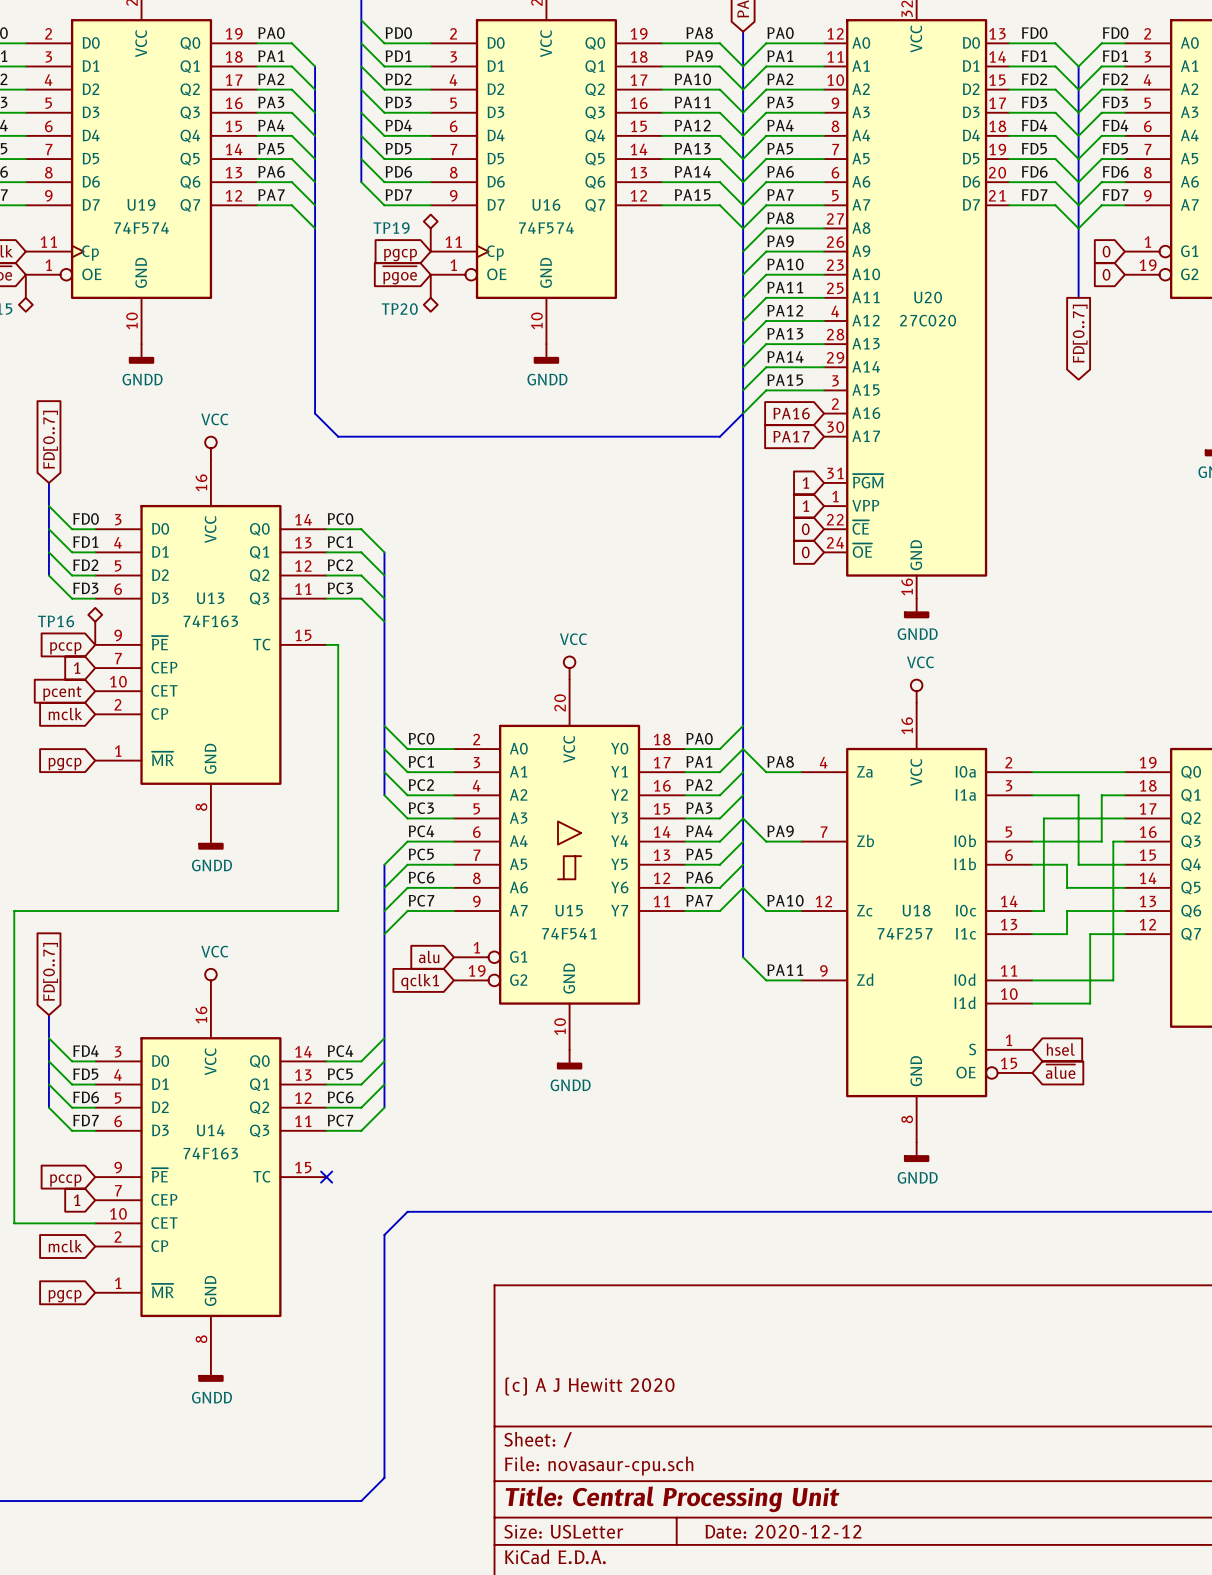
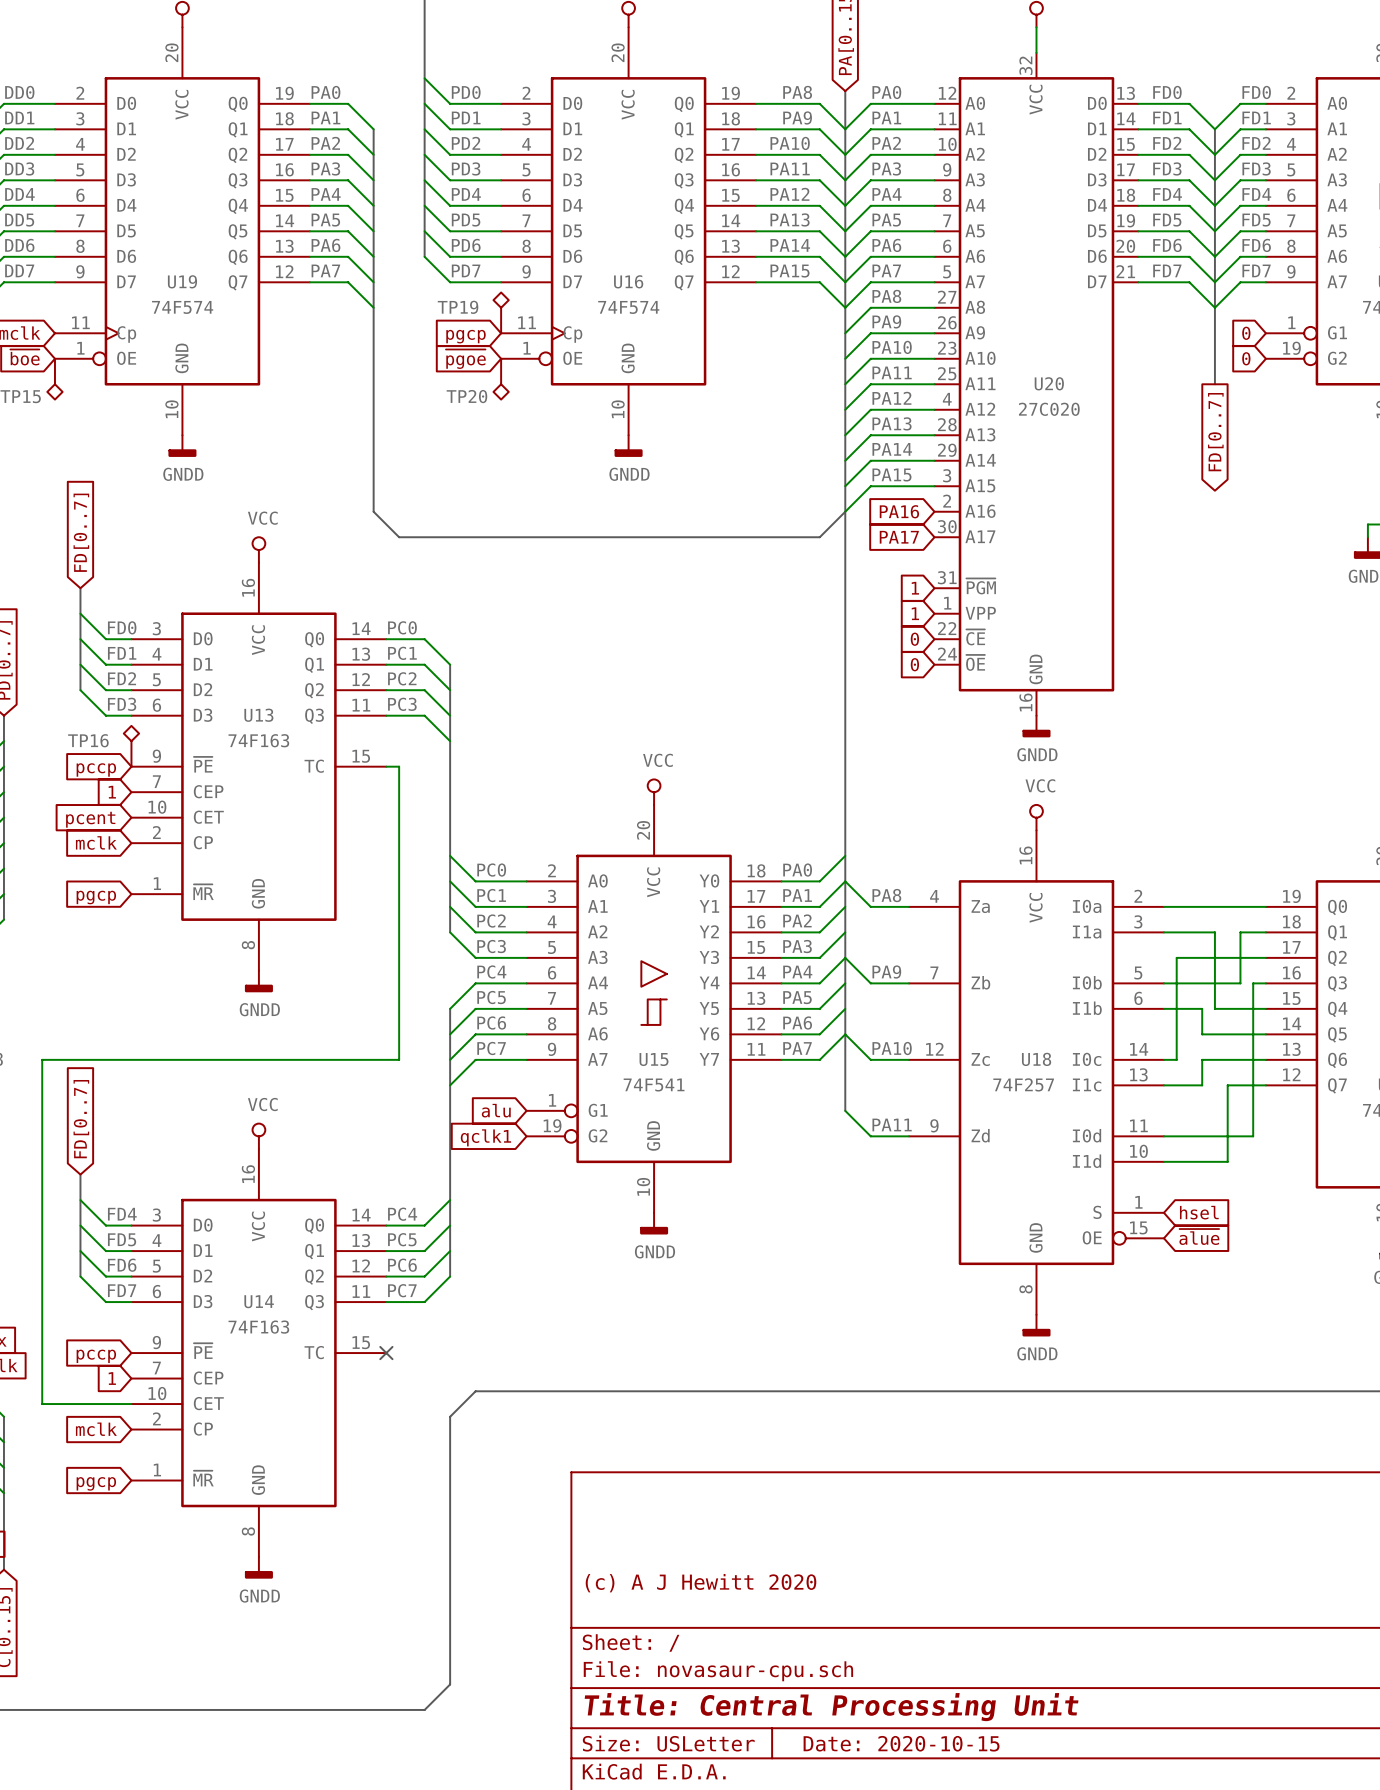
title block: Date: 2020-12-12 (783, 1531) -> Date: 2020-10-15 (901, 1743)

